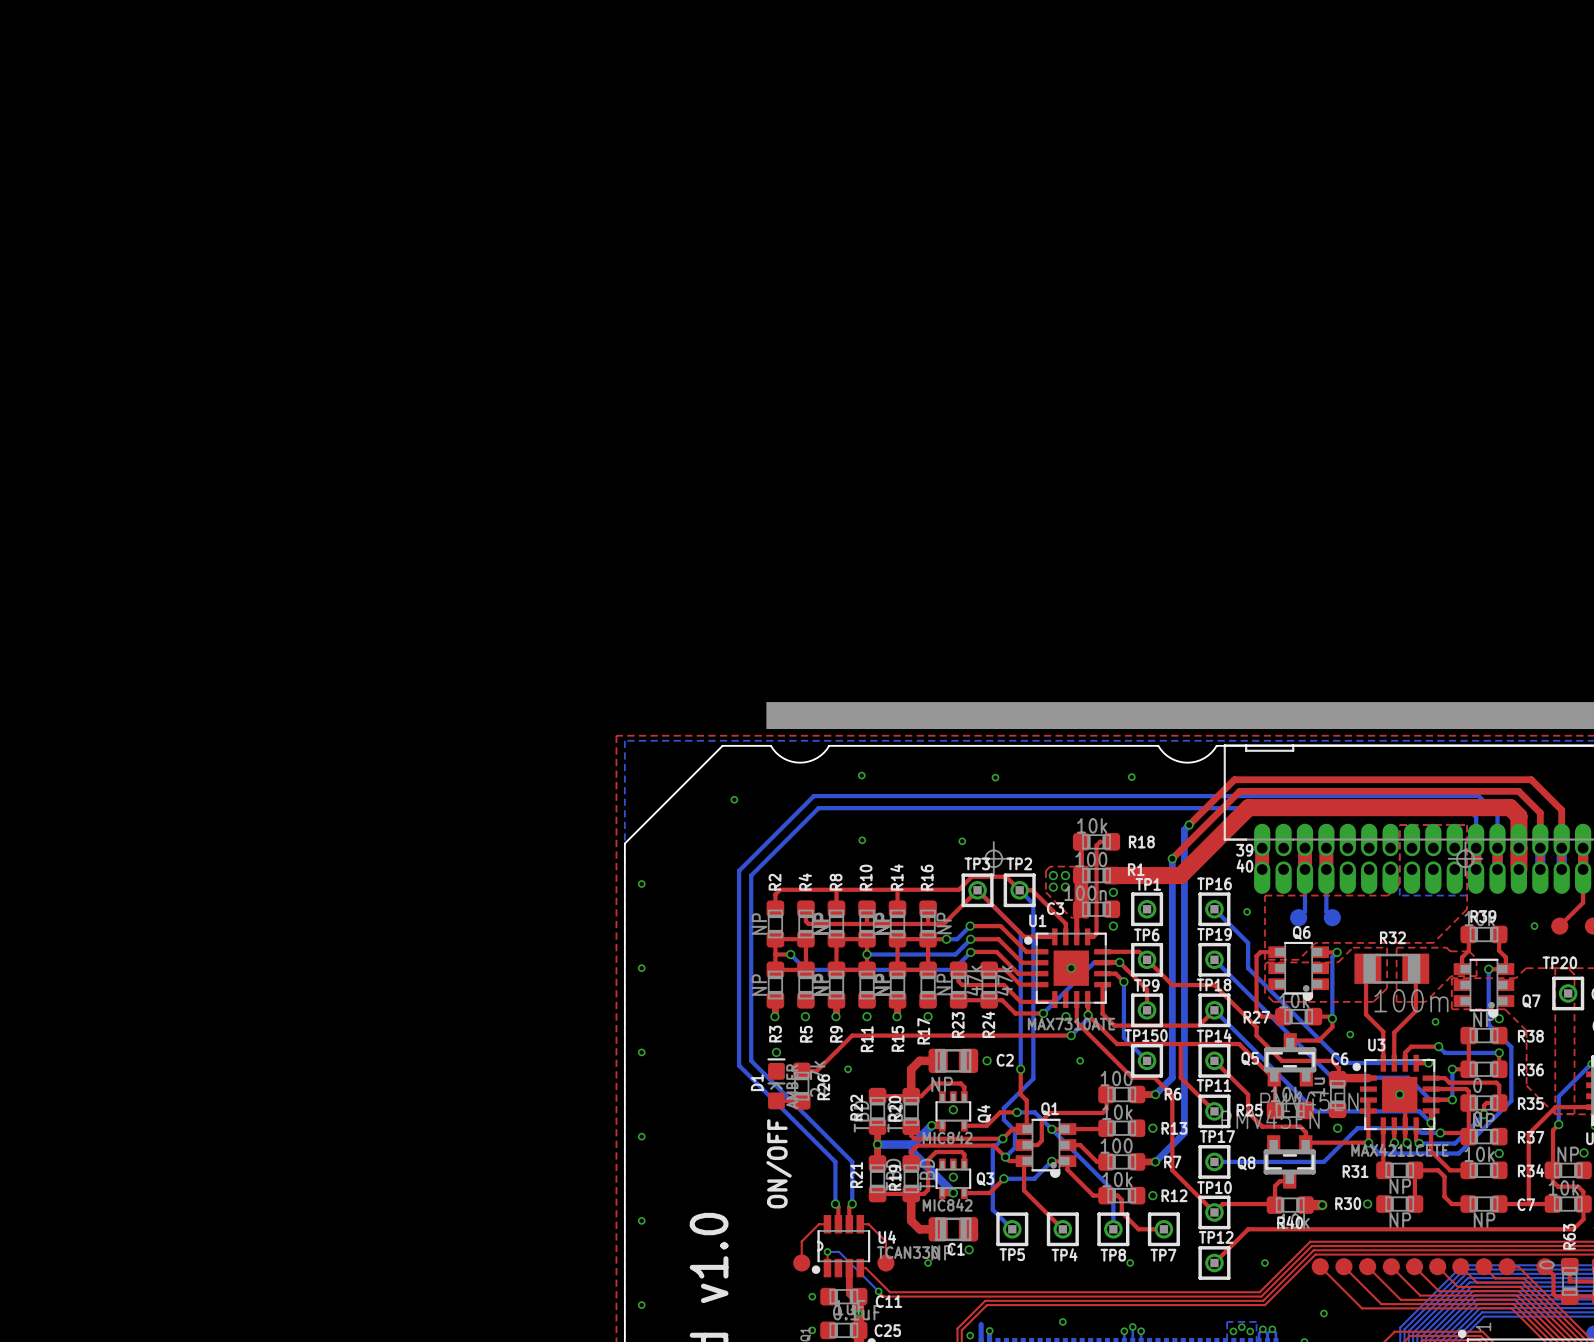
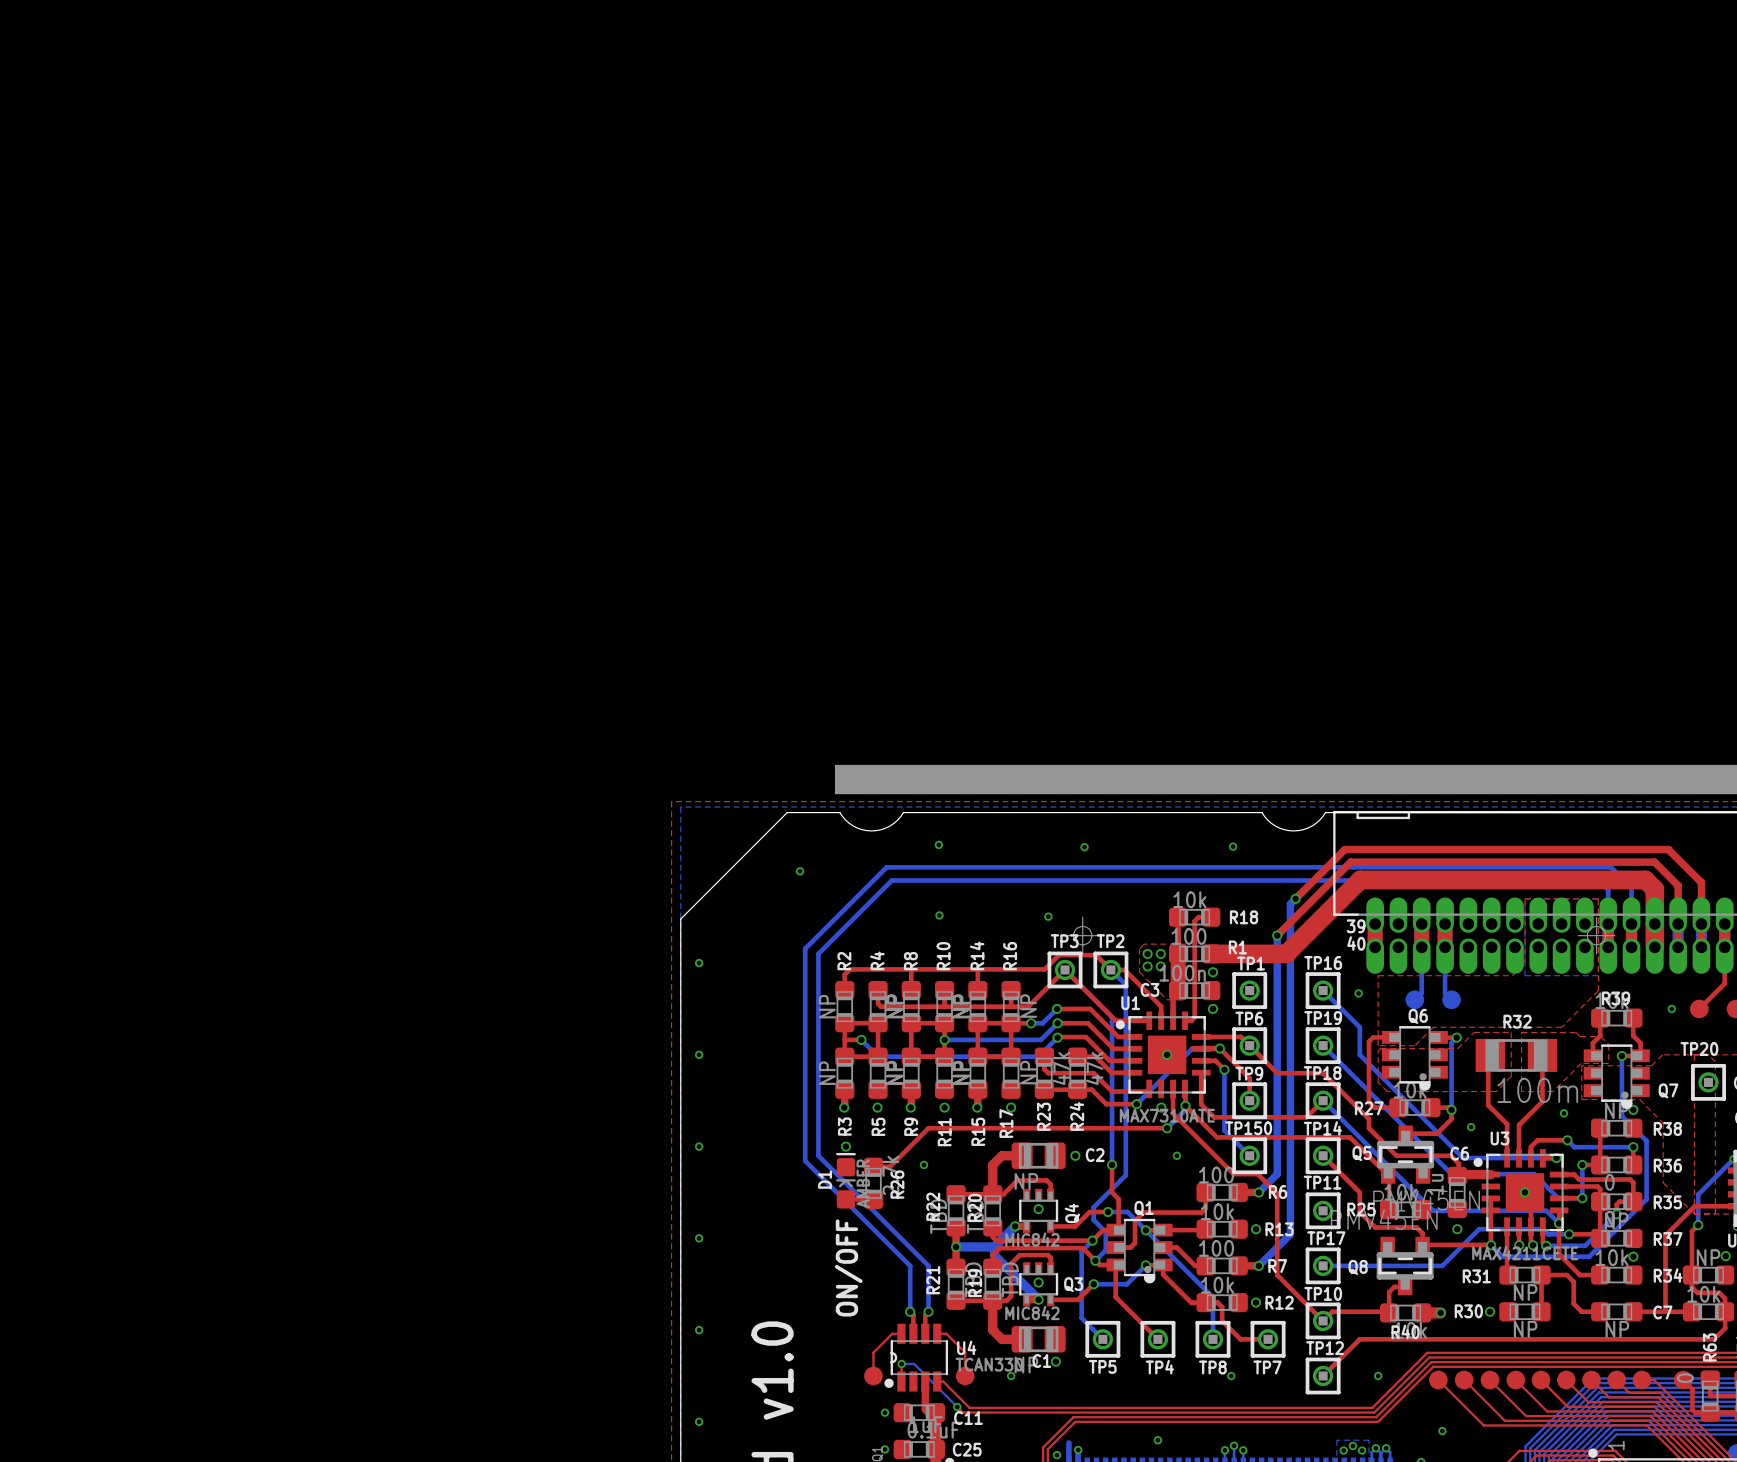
top track: (1180, 1044) (1180, 1077) (1214, 1111) -> none
via: (858, 1313) -> none

